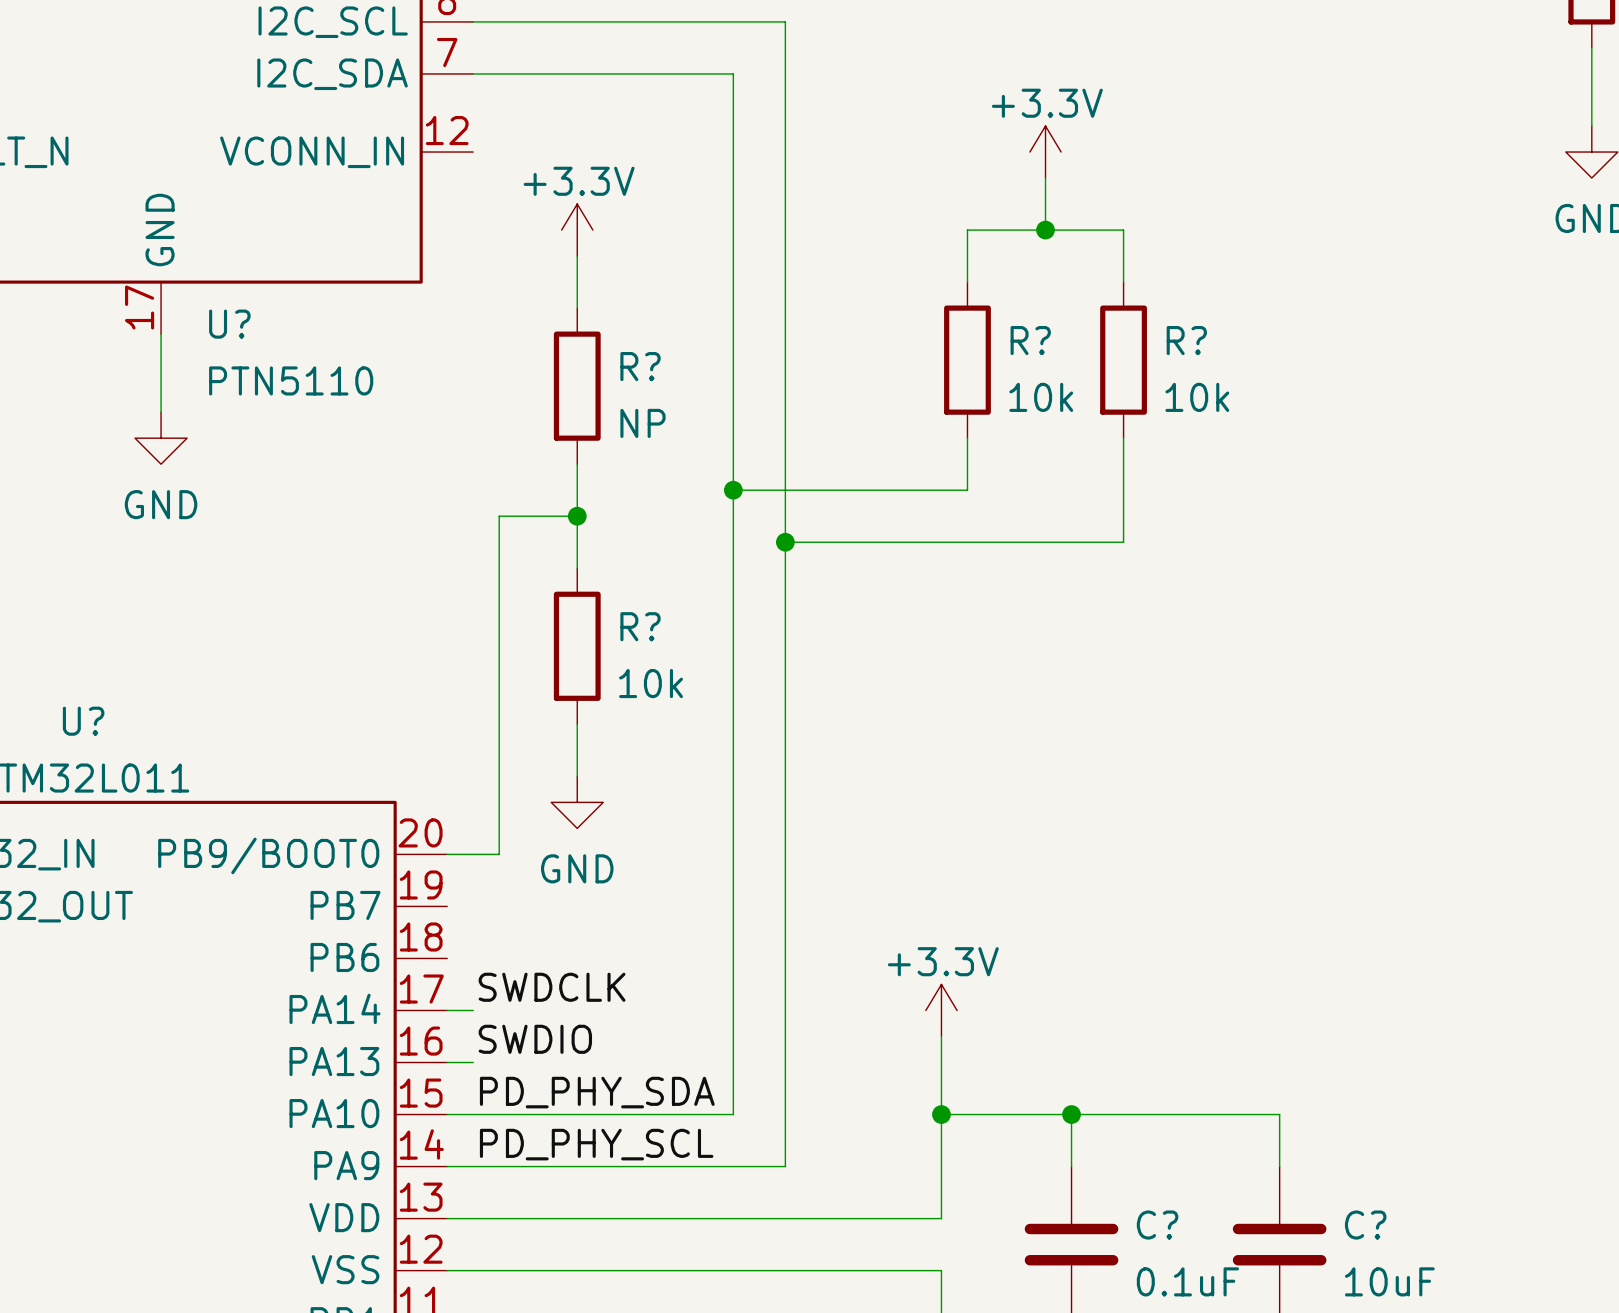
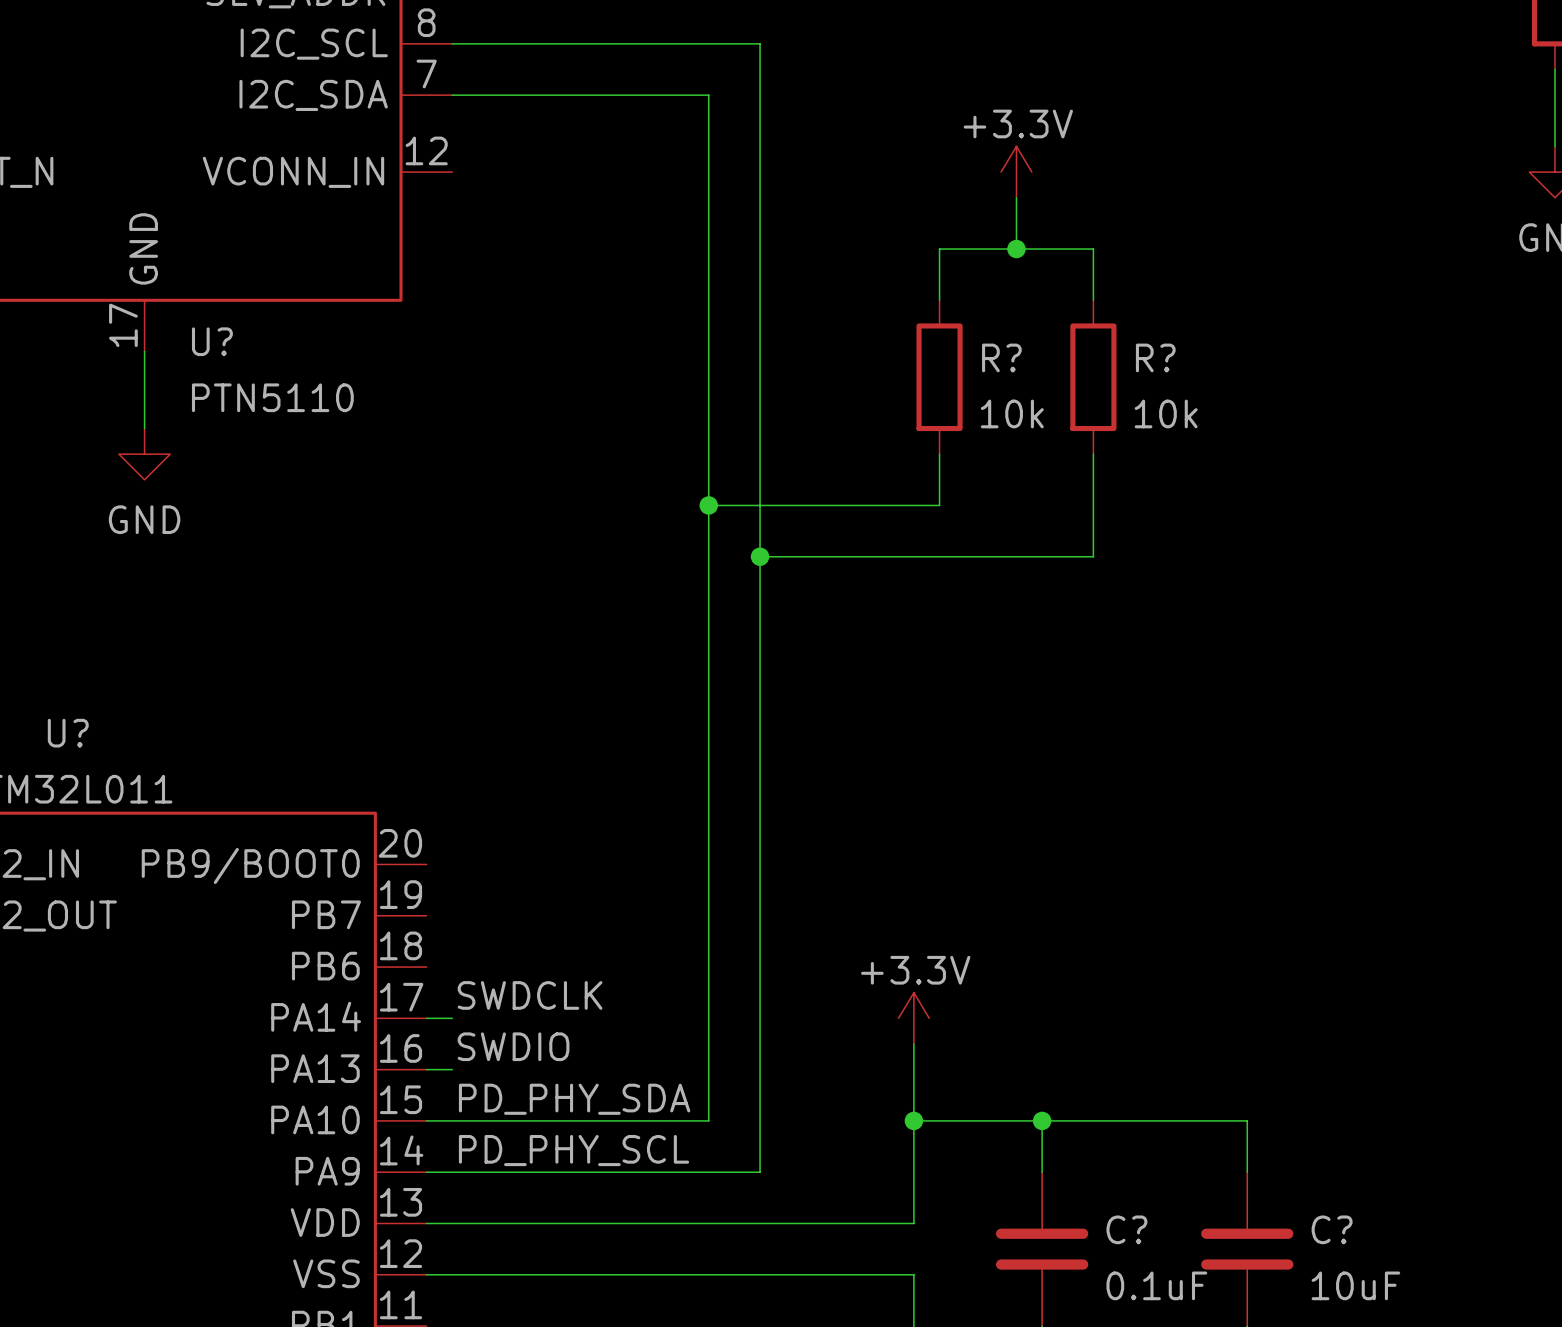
power symbol: +3.3V (577, 230) -> none
wire: (577, 256) (577, 308) -> none
R?: NP (577, 386) -> none
wire: (577, 464) (577, 568) -> none
wire: (577, 516) (499, 516) (499, 854) (447, 854) -> none
junction: (577, 516) -> none
R?: 10k (577, 646) -> none
wire: (577, 724) (577, 776) -> none
power symbol: GND (577, 802) -> none

